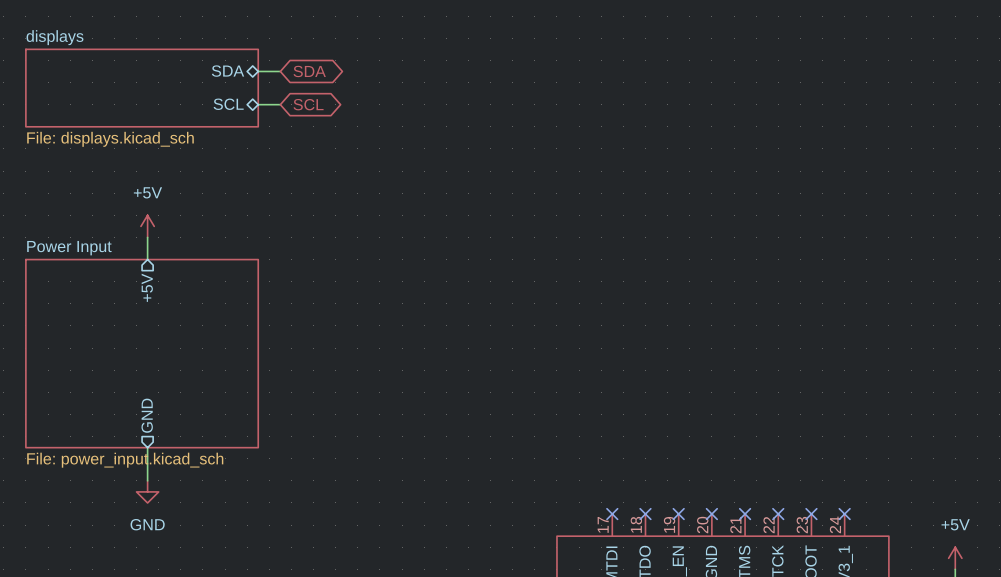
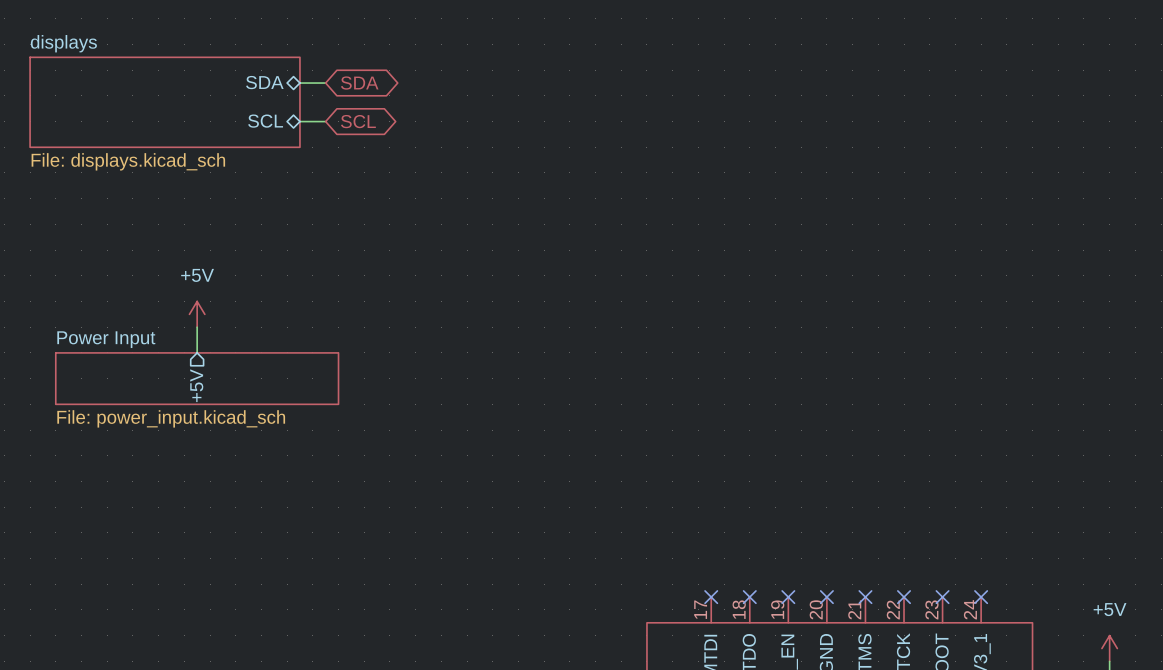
power symbol position: +5V (147, 226) -> +5V (197, 314)
wire: (147, 237) (147, 259) -> (197, 327) (197, 352)
sheet pin position: +5V (147, 287) -> +5V (196, 385)
sheet Power Input: none -> File: power_input.kicad_sch (197, 378)
sheet Power Input: File: power_input.kicad_sch (142, 353) -> none
sheet pin: GND (147, 415) -> none
wire: (147, 447) (147, 480) -> none
power symbol: GND (147, 491) -> none

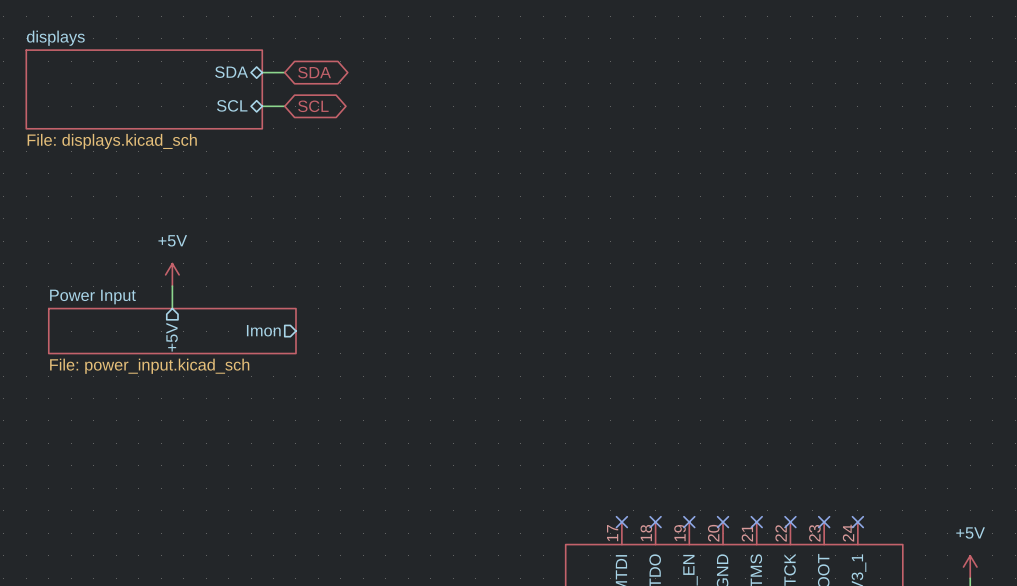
sheet pin: none -> Imon (263, 330)

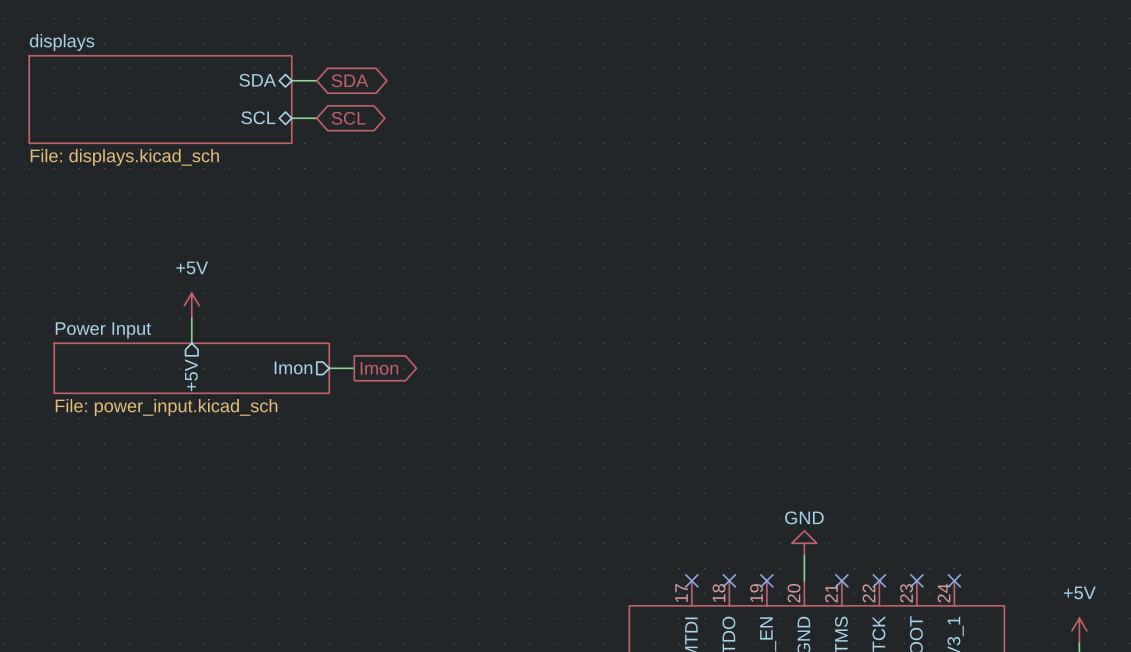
wire: none -> (329, 368) (354, 368)
global label: none -> Imon (379, 368)
power symbol: none -> GND (804, 543)
wire: none -> (804, 555) (804, 580)
no-connect mark: (723, 522) -> none

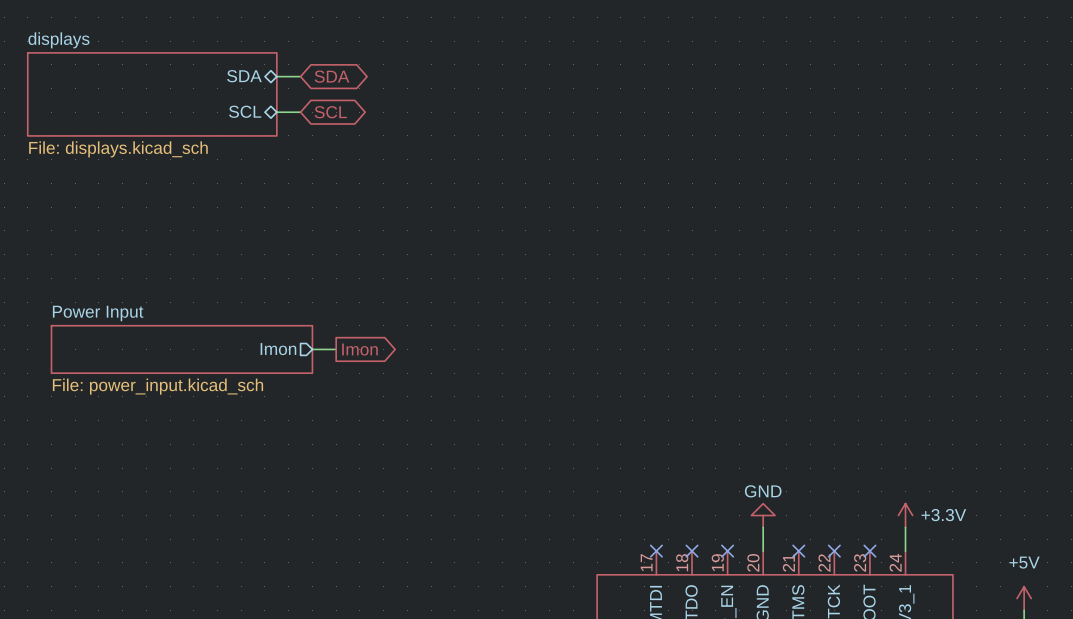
power symbol: +5V (191, 305) -> none
wire: (191, 318) (191, 343) -> none
sheet pin: +5V (191, 375) -> none
power symbol: none -> +3.3V (905, 515)
wire: none -> (905, 527) (905, 551)
no-connect mark: (954, 580) -> none

